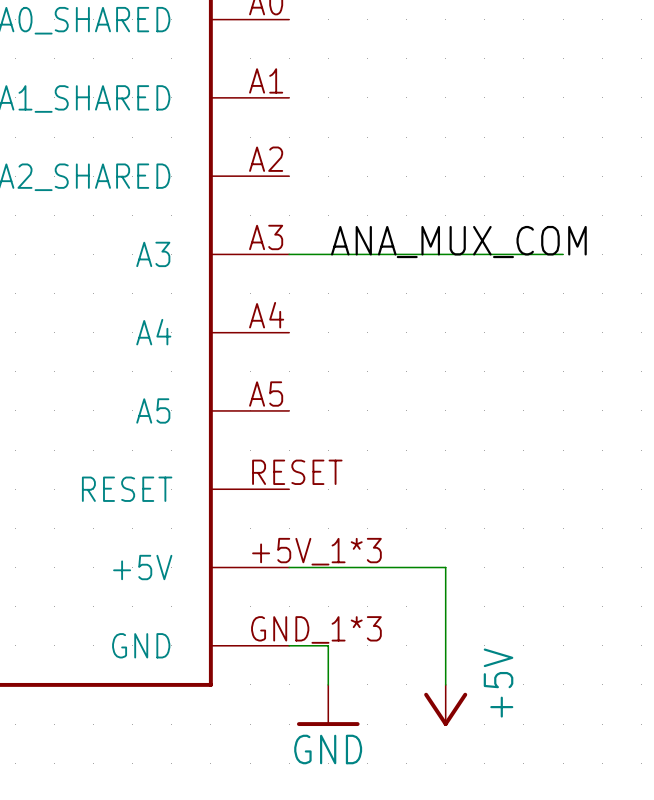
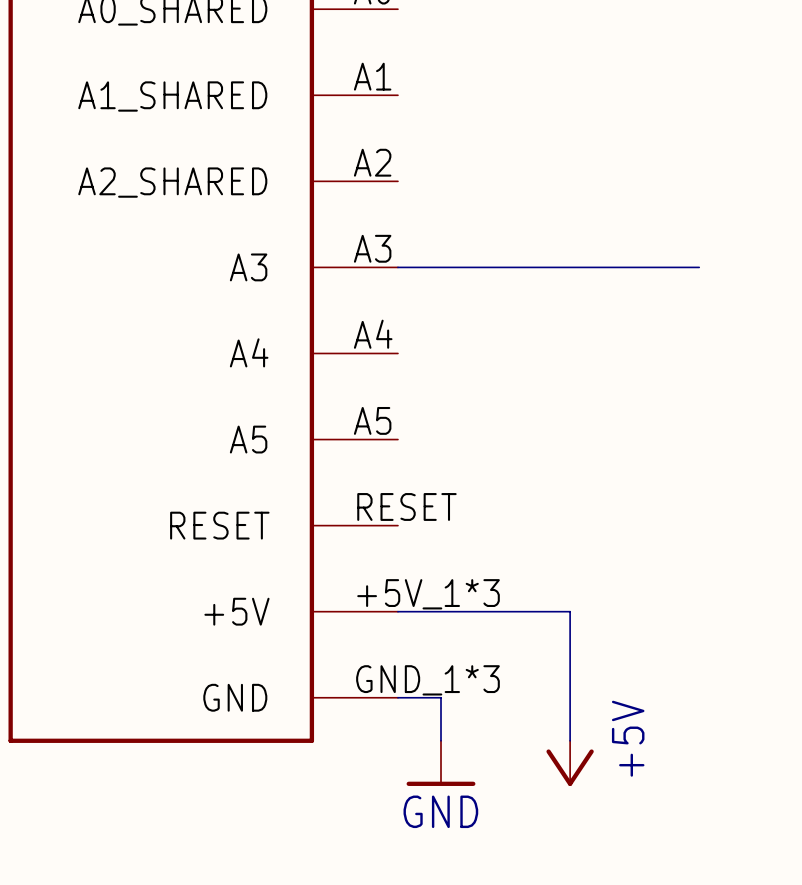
label: ANA_MUX_COM (458, 242) -> none

